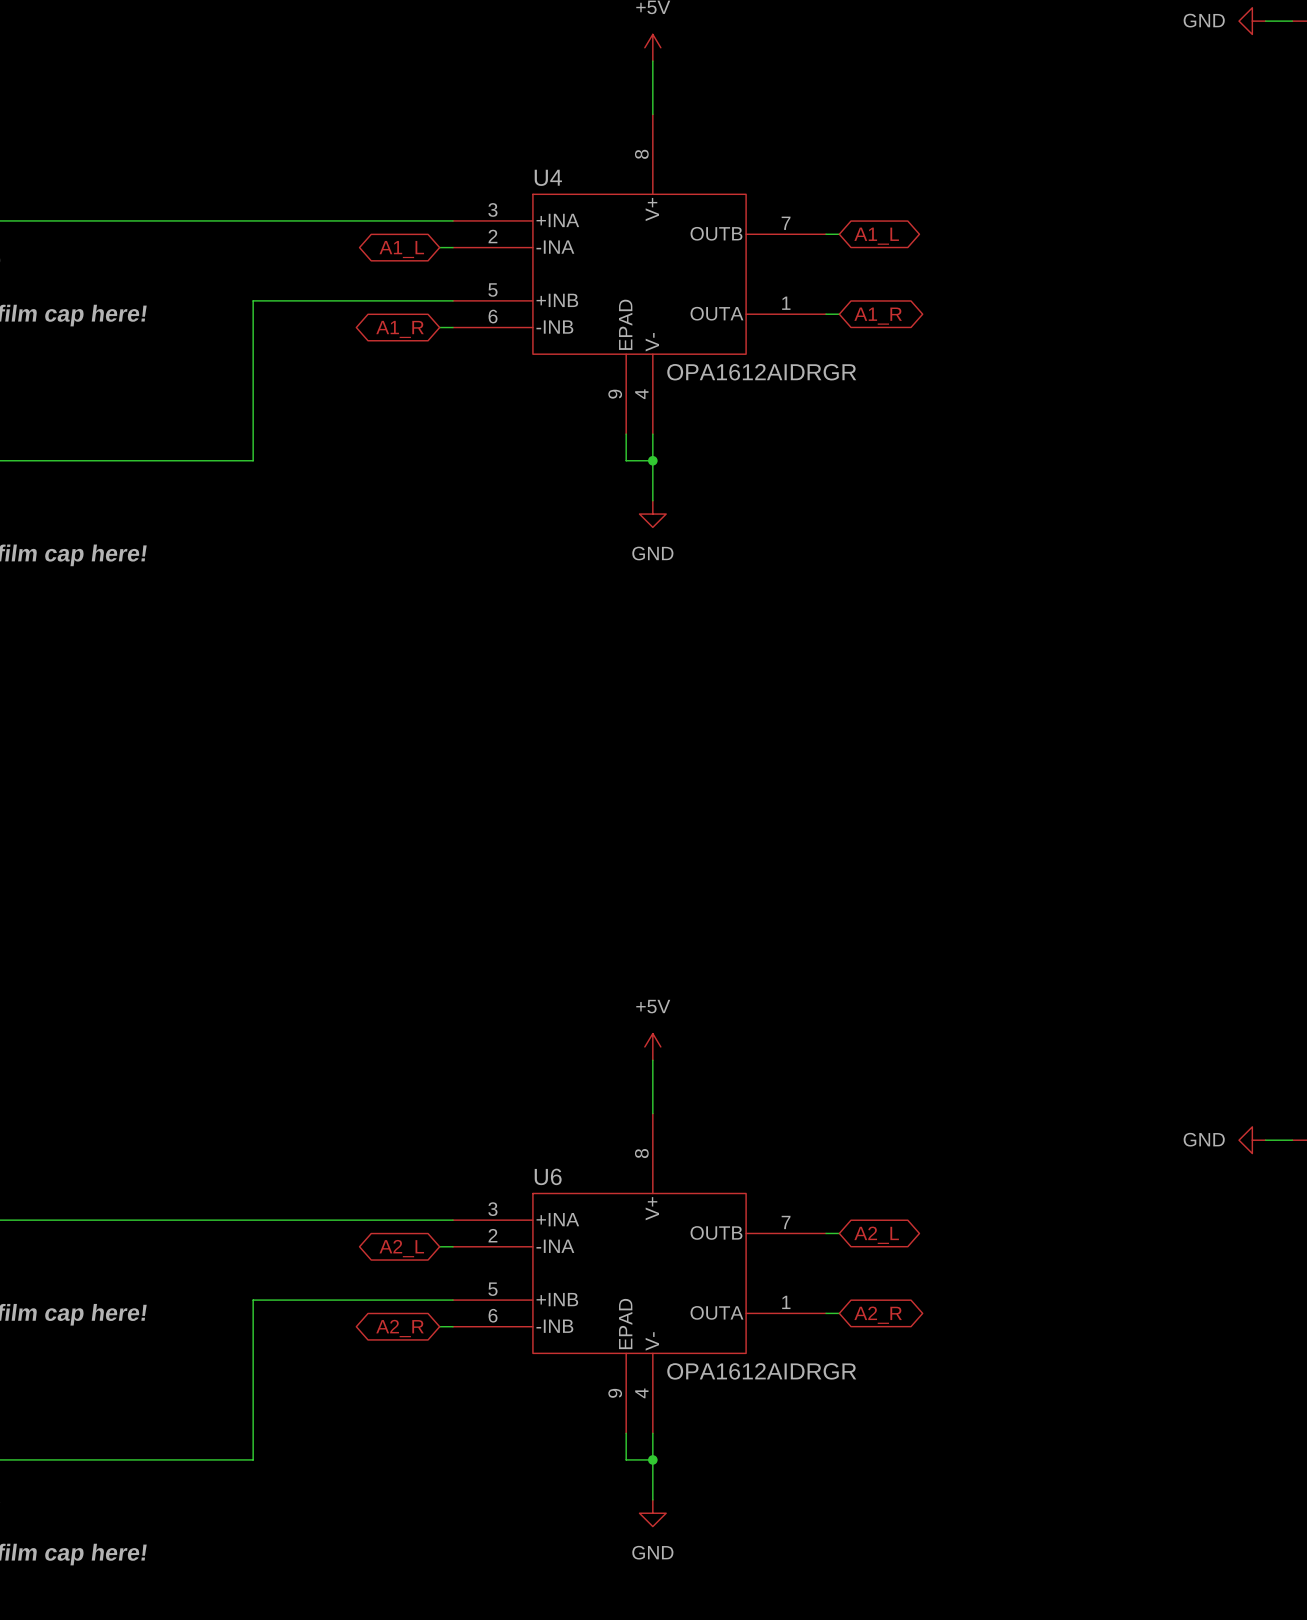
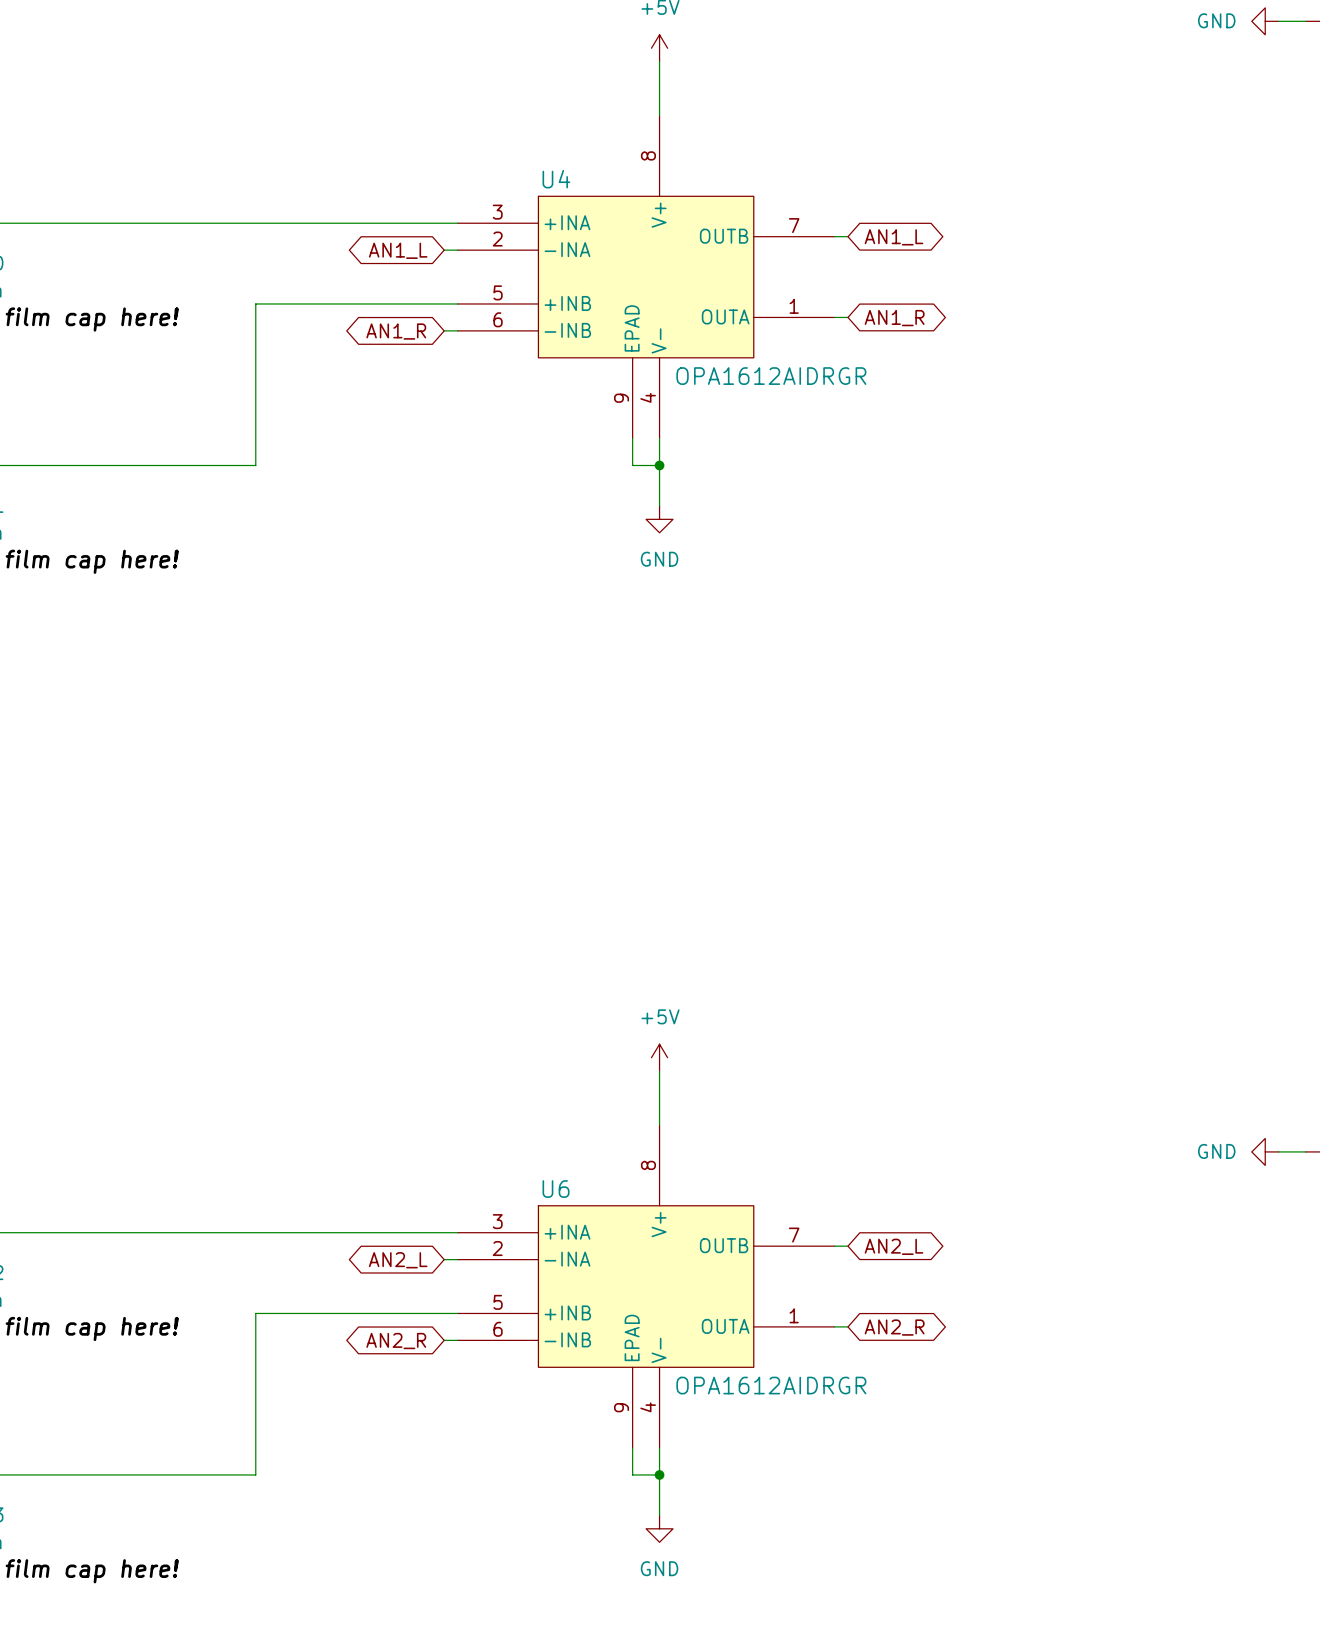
global label: A1_L (876, 236) -> AN1_L (894, 237)
global label: A1_L (401, 249) -> AN1_L (398, 250)
global label: A1_R (878, 316) -> AN1_R (894, 318)
global label: A1_R (400, 329) -> AN1_R (396, 331)
global label: A2_L (876, 1235) -> AN2_L (894, 1246)
global label: A2_L (401, 1248) -> AN2_L (398, 1260)
global label: A2_R (878, 1315) -> AN2_R (894, 1327)
global label: A2_R (400, 1328) -> AN2_R (396, 1341)

